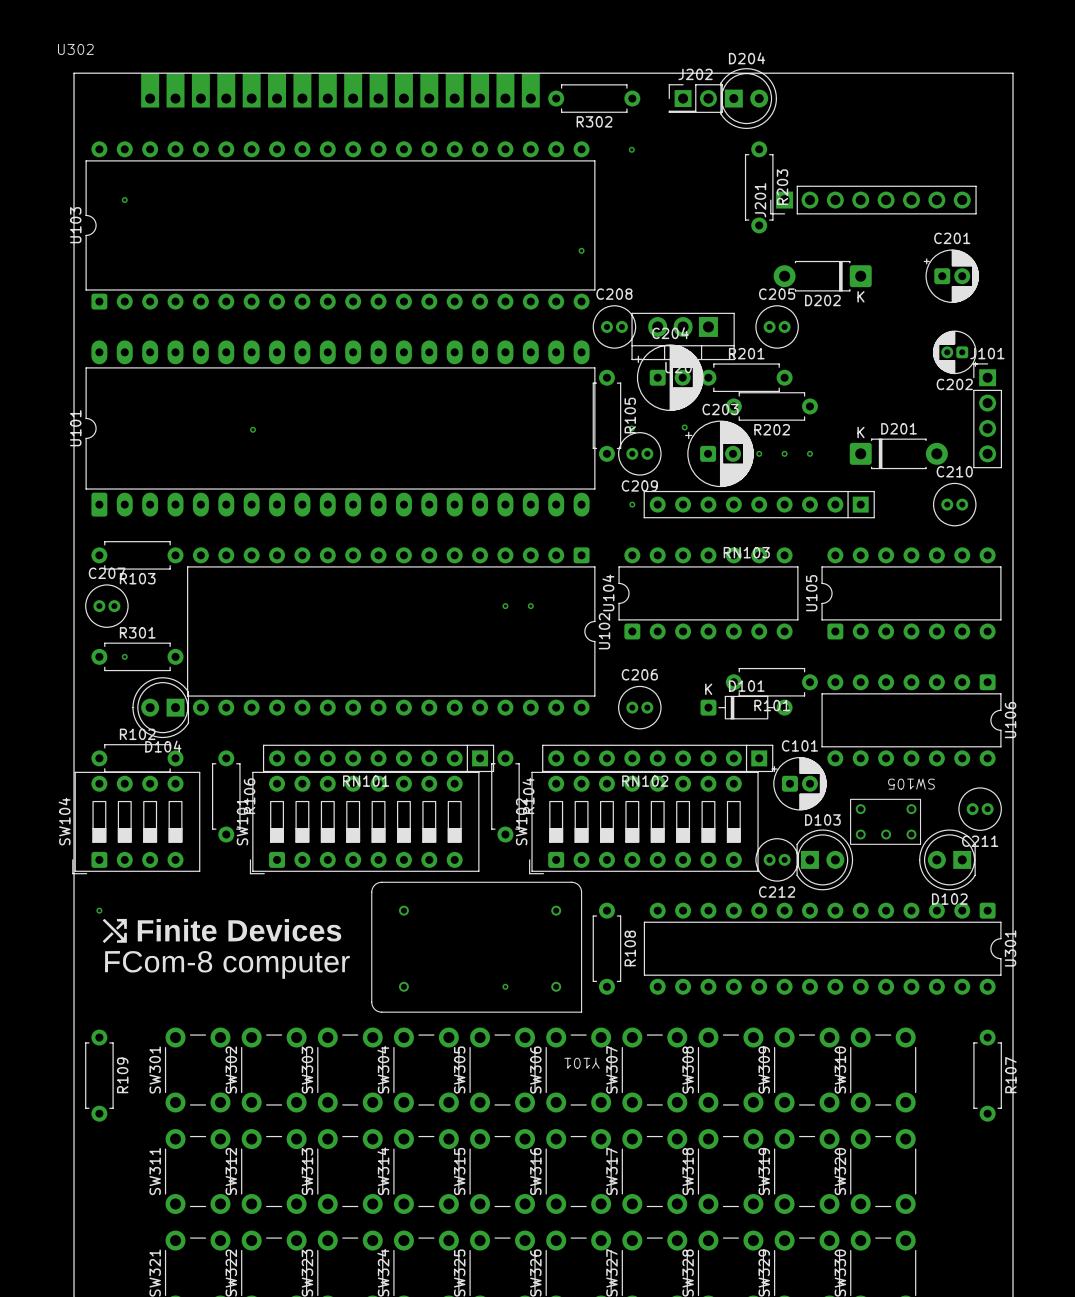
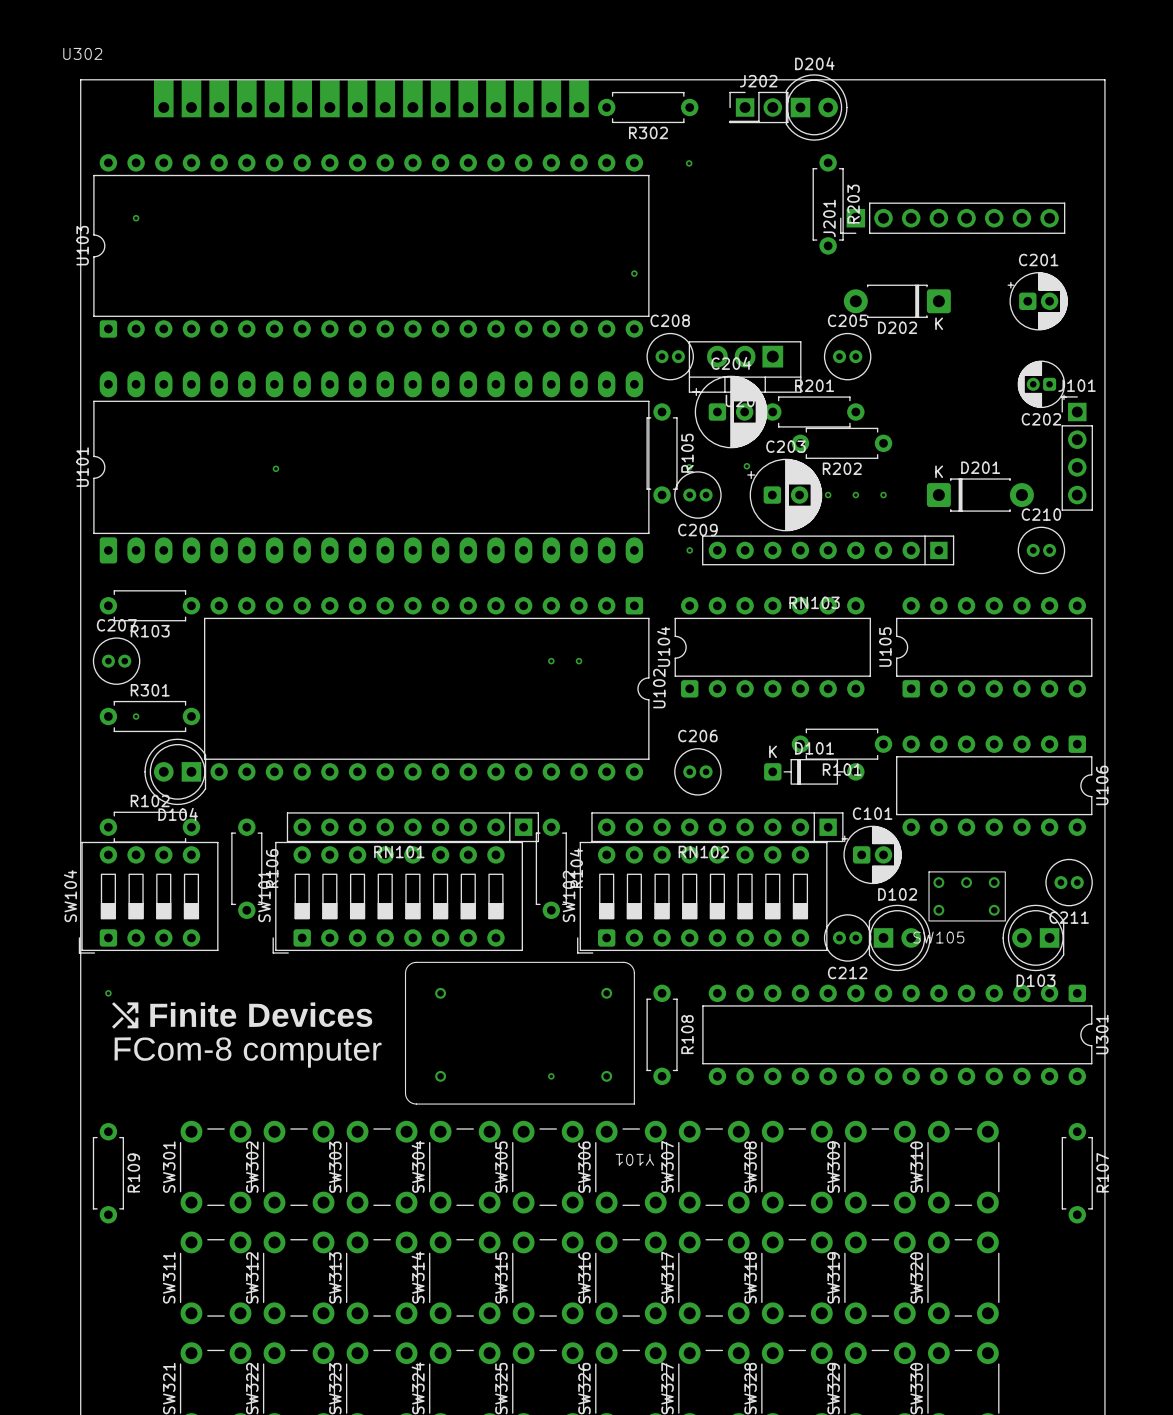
D103 name: D103 (822, 819) -> D102 (897, 894)
SW105 rotation: 0° (885, 821) -> 180° (967, 896)
D102 name: D102 (949, 899) -> D103 (1036, 980)

